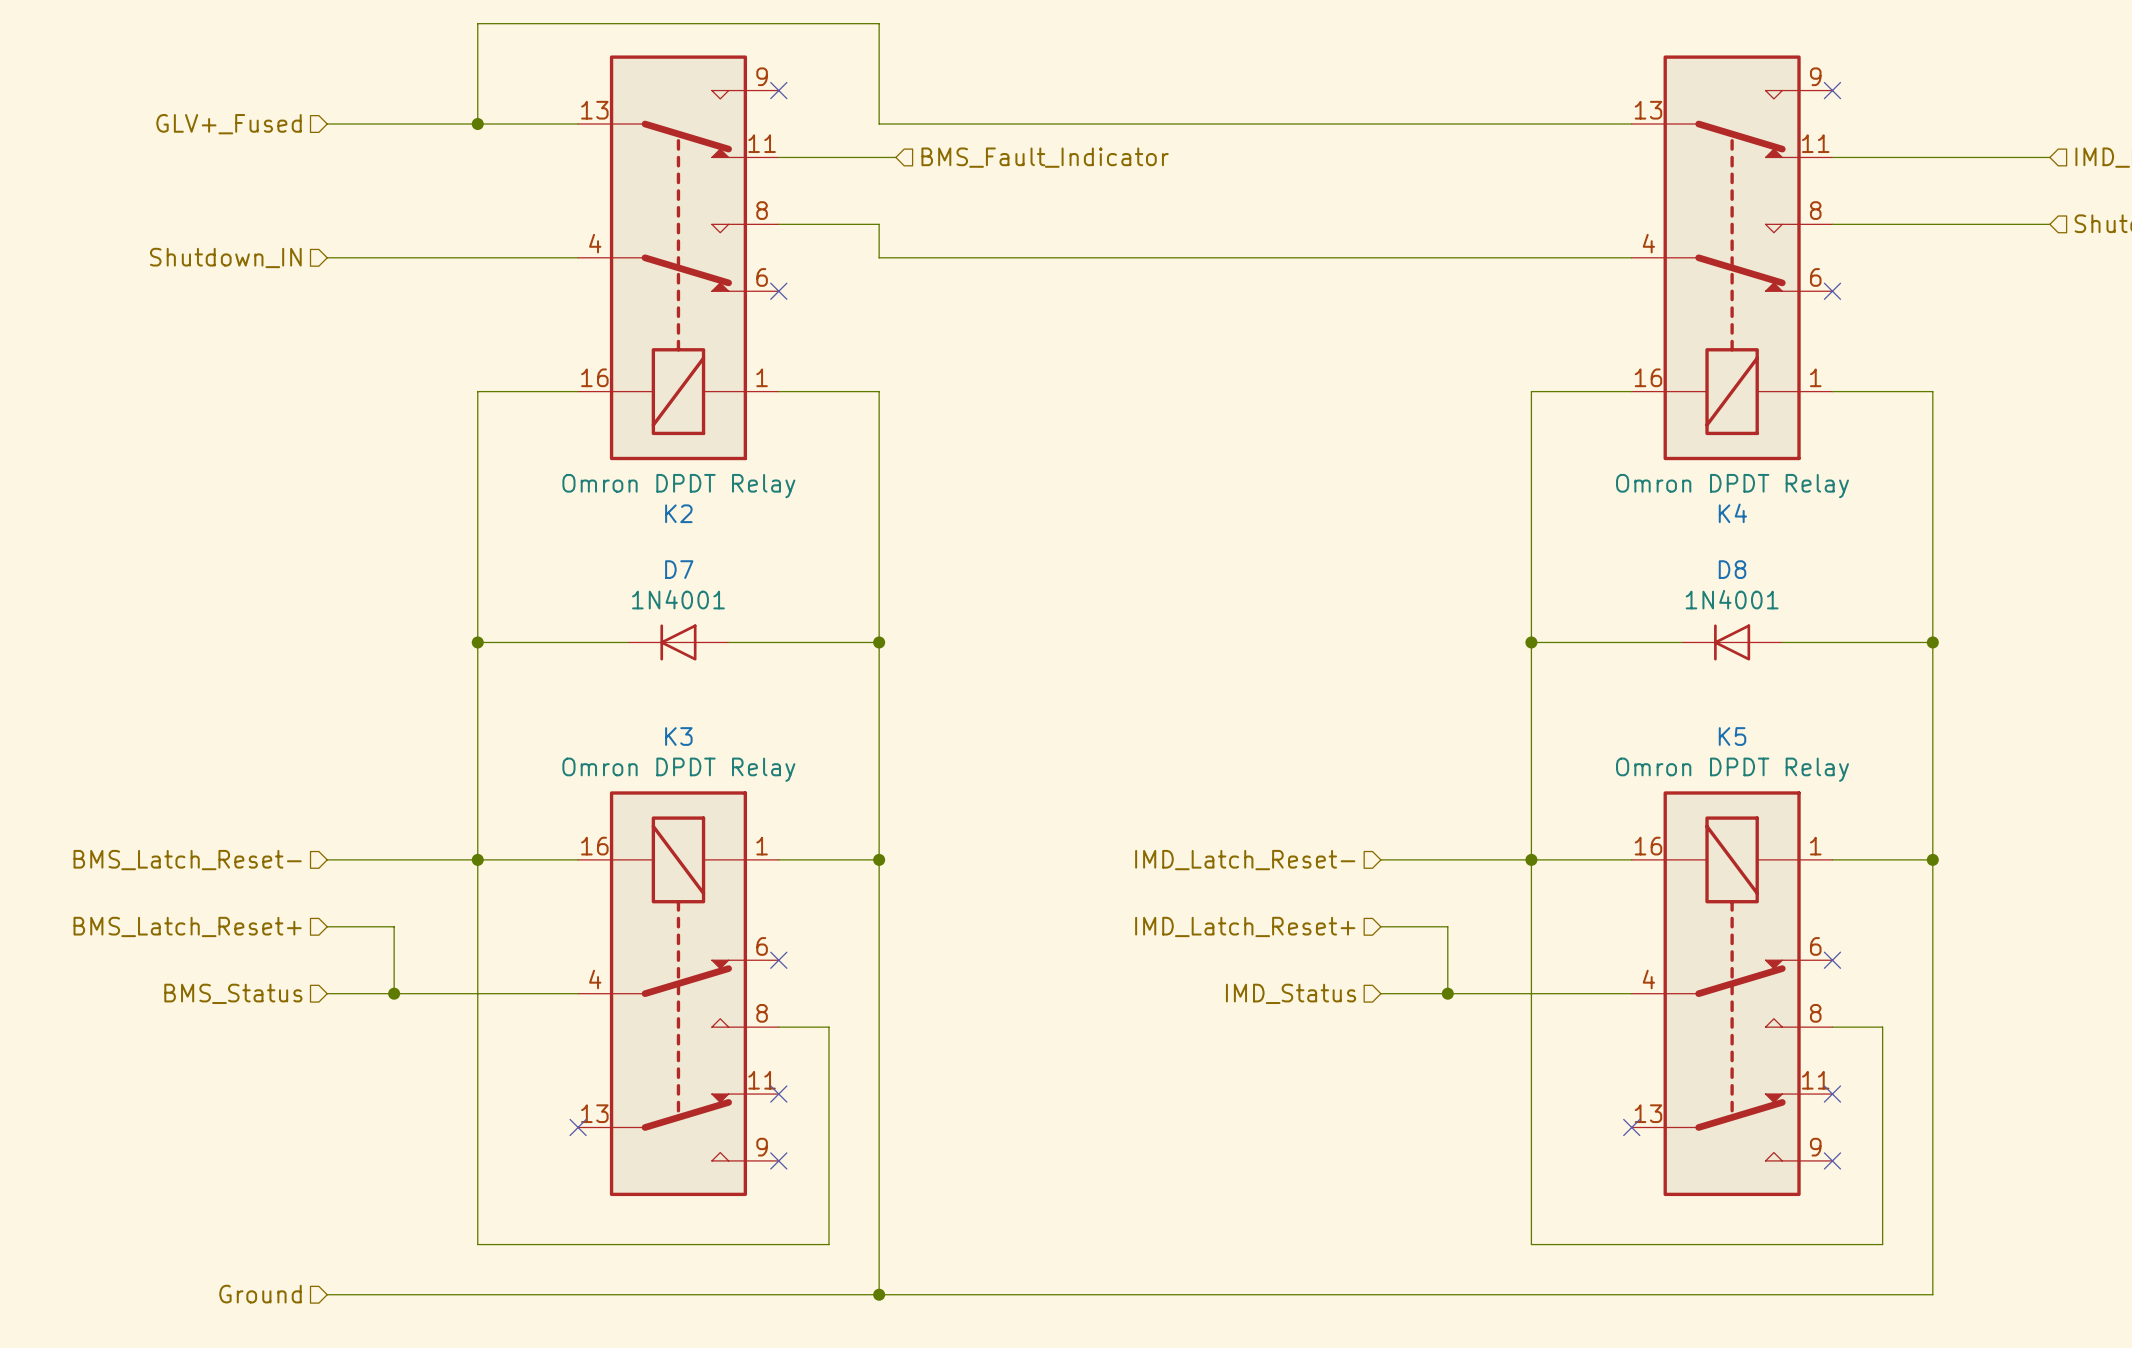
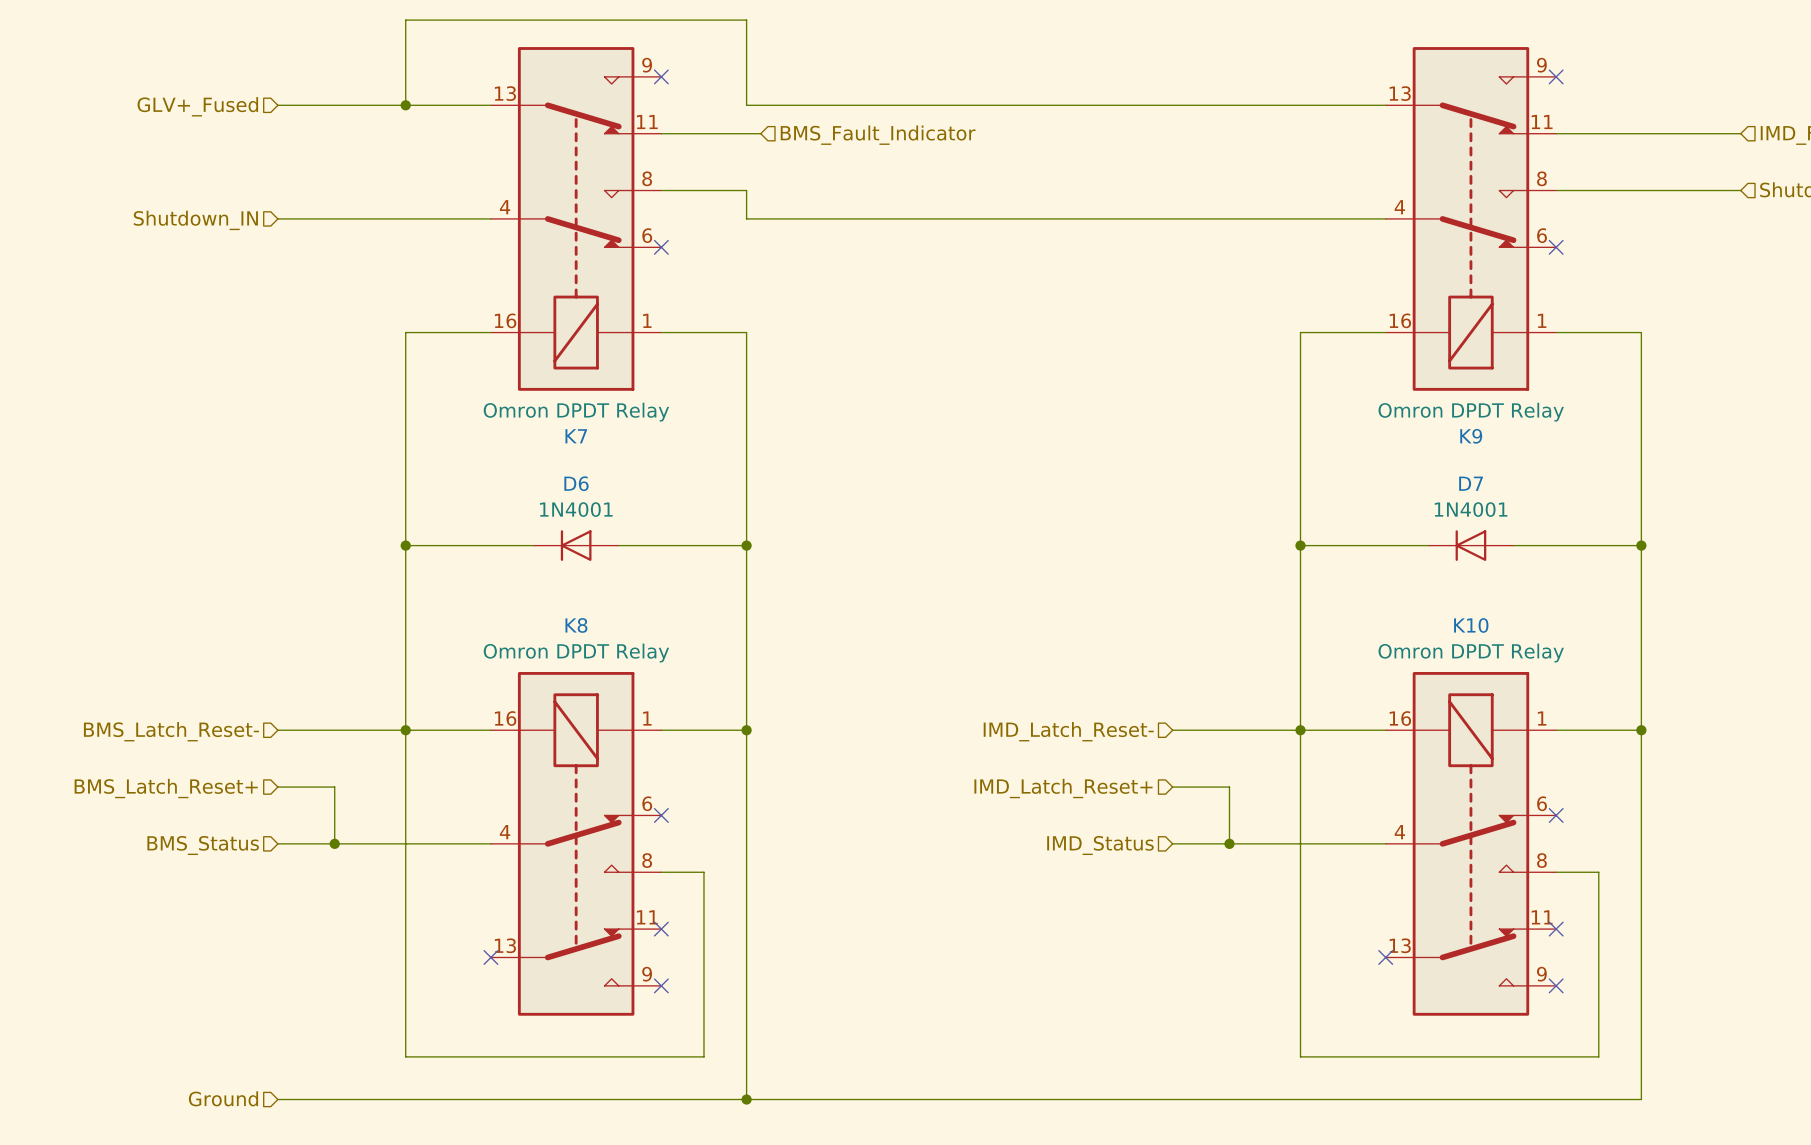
K2 name: K2 (678, 513) -> K7 (576, 436)
K4 name: K4 (1732, 513) -> K9 (1471, 436)
D7 name: D7 (679, 569) -> D6 (576, 483)
D8 name: D8 (1732, 569) -> D7 (1471, 483)
K3 name: K3 (678, 736) -> K8 (576, 625)
K5 name: K5 (1732, 736) -> K10 (1471, 625)

